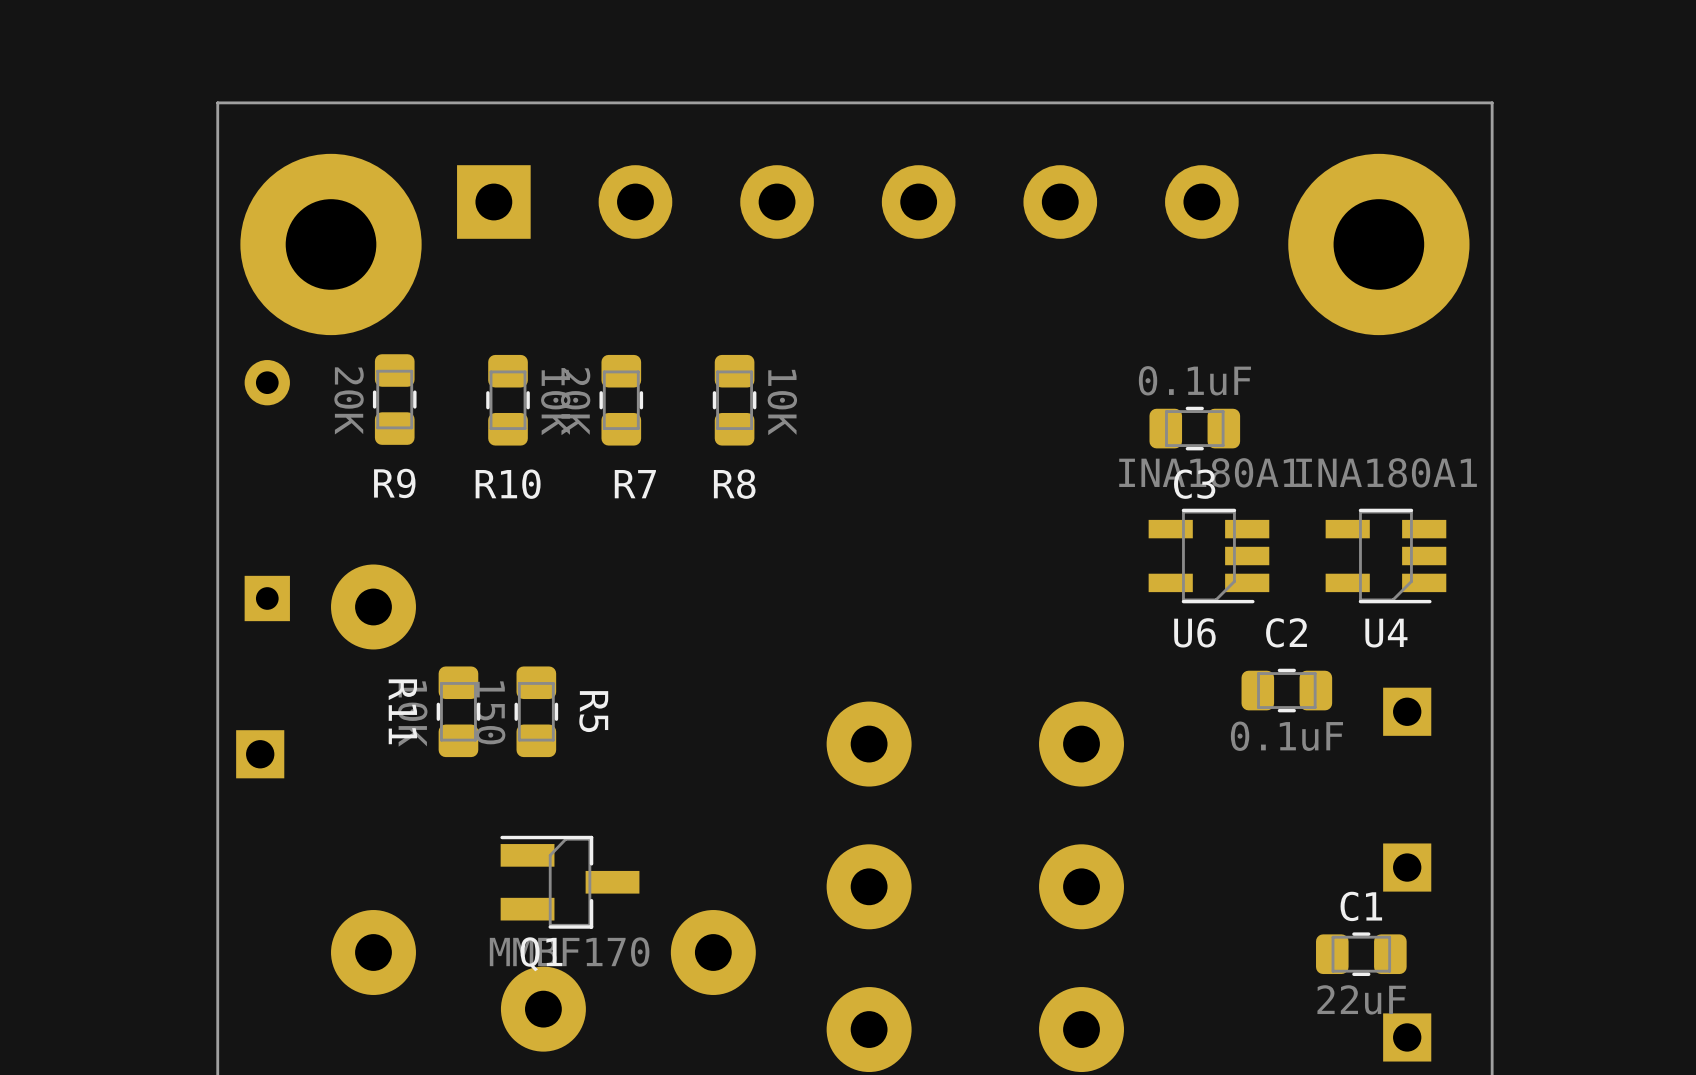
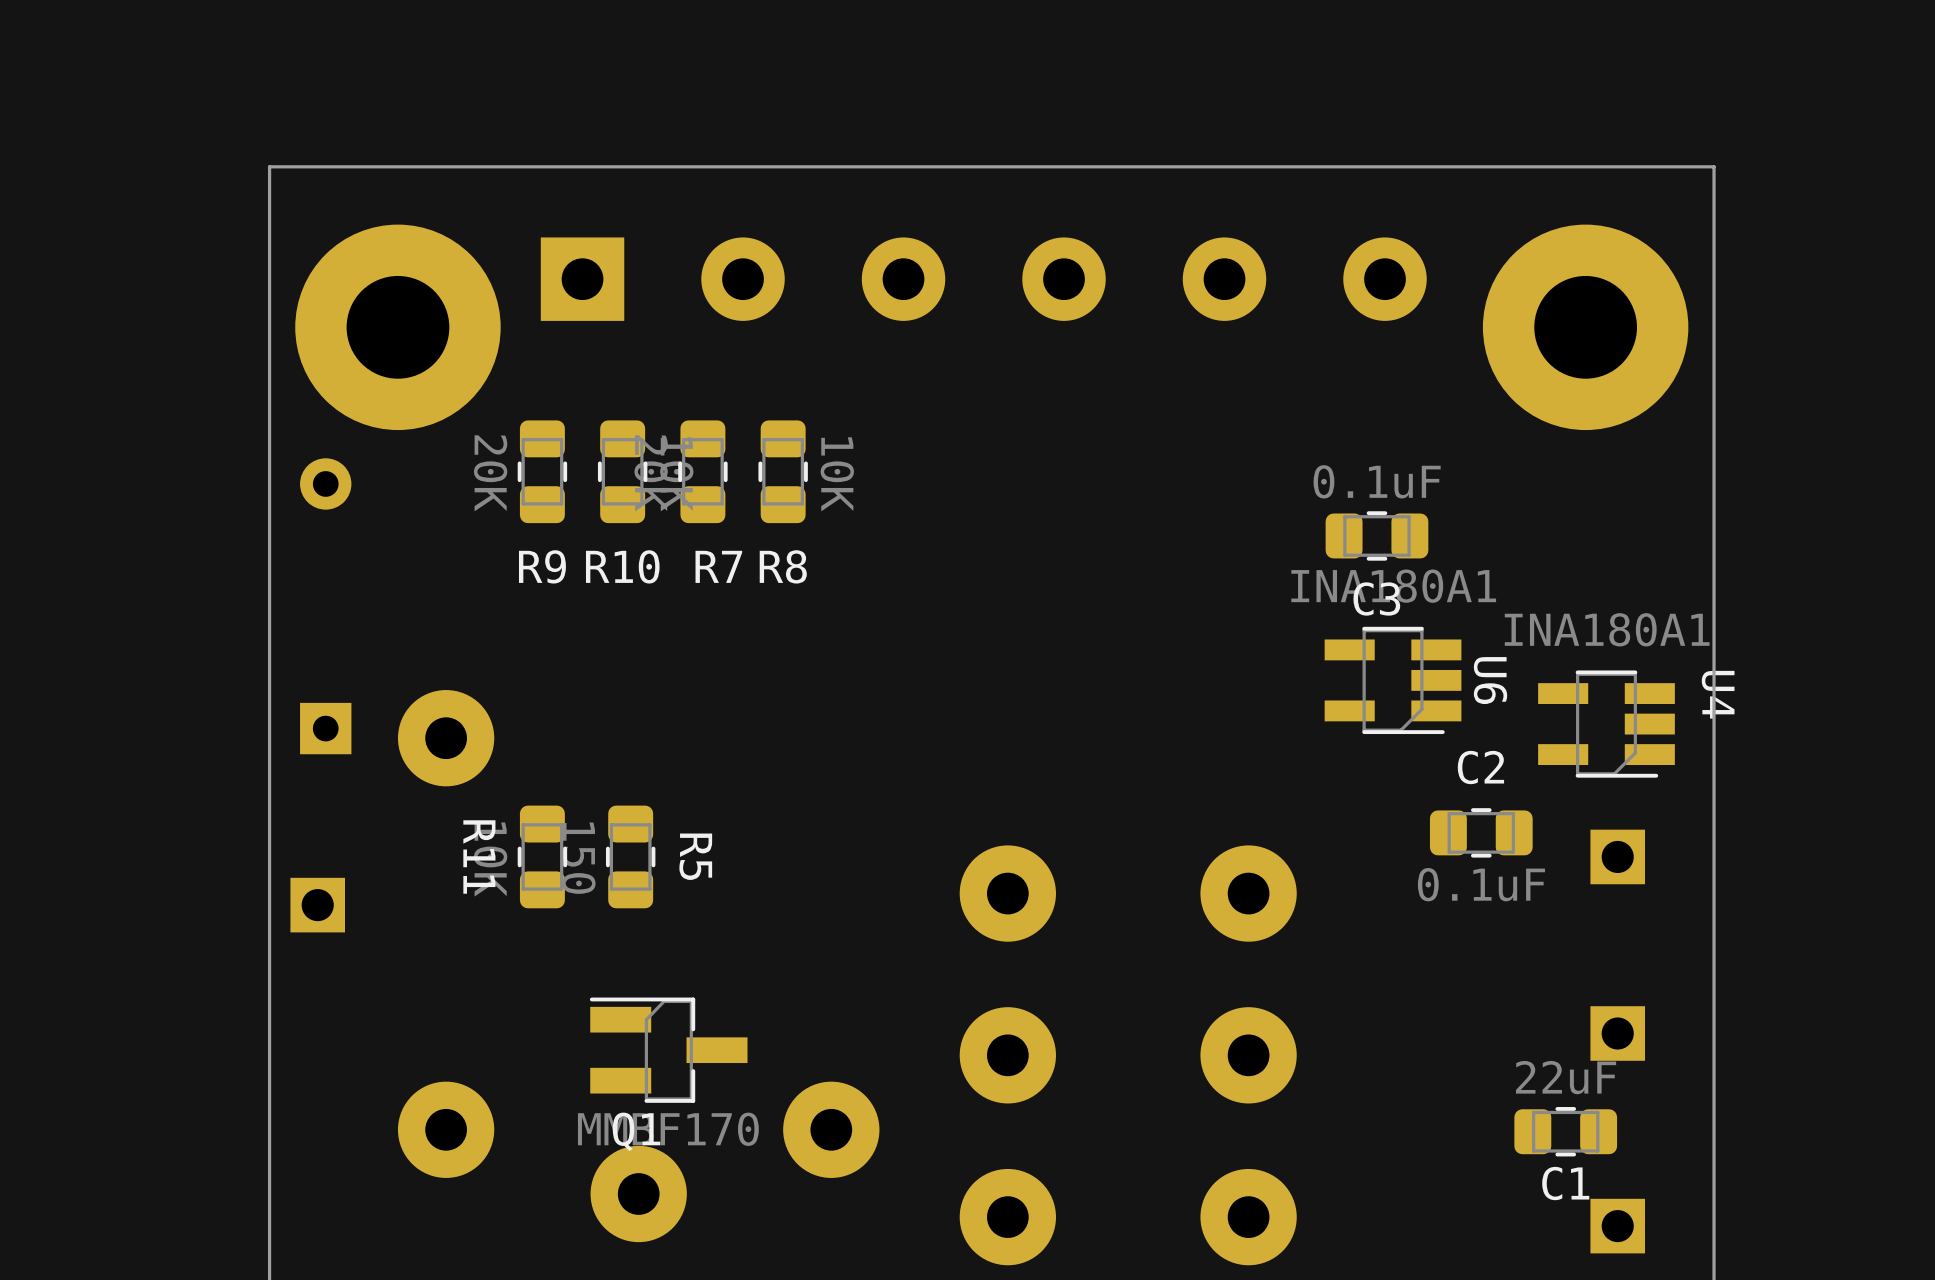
R9 position: (394, 399) -> (542, 471)
R10 position: (508, 400) -> (622, 471)
R7 position: (621, 400) -> (702, 471)
R8 position: (734, 400) -> (783, 471)
U4 position: (1385, 556) -> (1606, 724)
U6 name rotation: 0° (1194, 632) -> 90° clockwise (1490, 680)
U6 name position: U6 (1194, 632) -> U6 (1490, 680)
U4 name rotation: 0° (1386, 633) -> 90° clockwise (1718, 694)
U4 name position: U4 (1386, 633) -> U4 (1718, 694)
C1 name position: C1 (1361, 906) -> C1 (1565, 1183)
C1 value position: 22uF (1361, 999) -> 22uF (1566, 1077)

